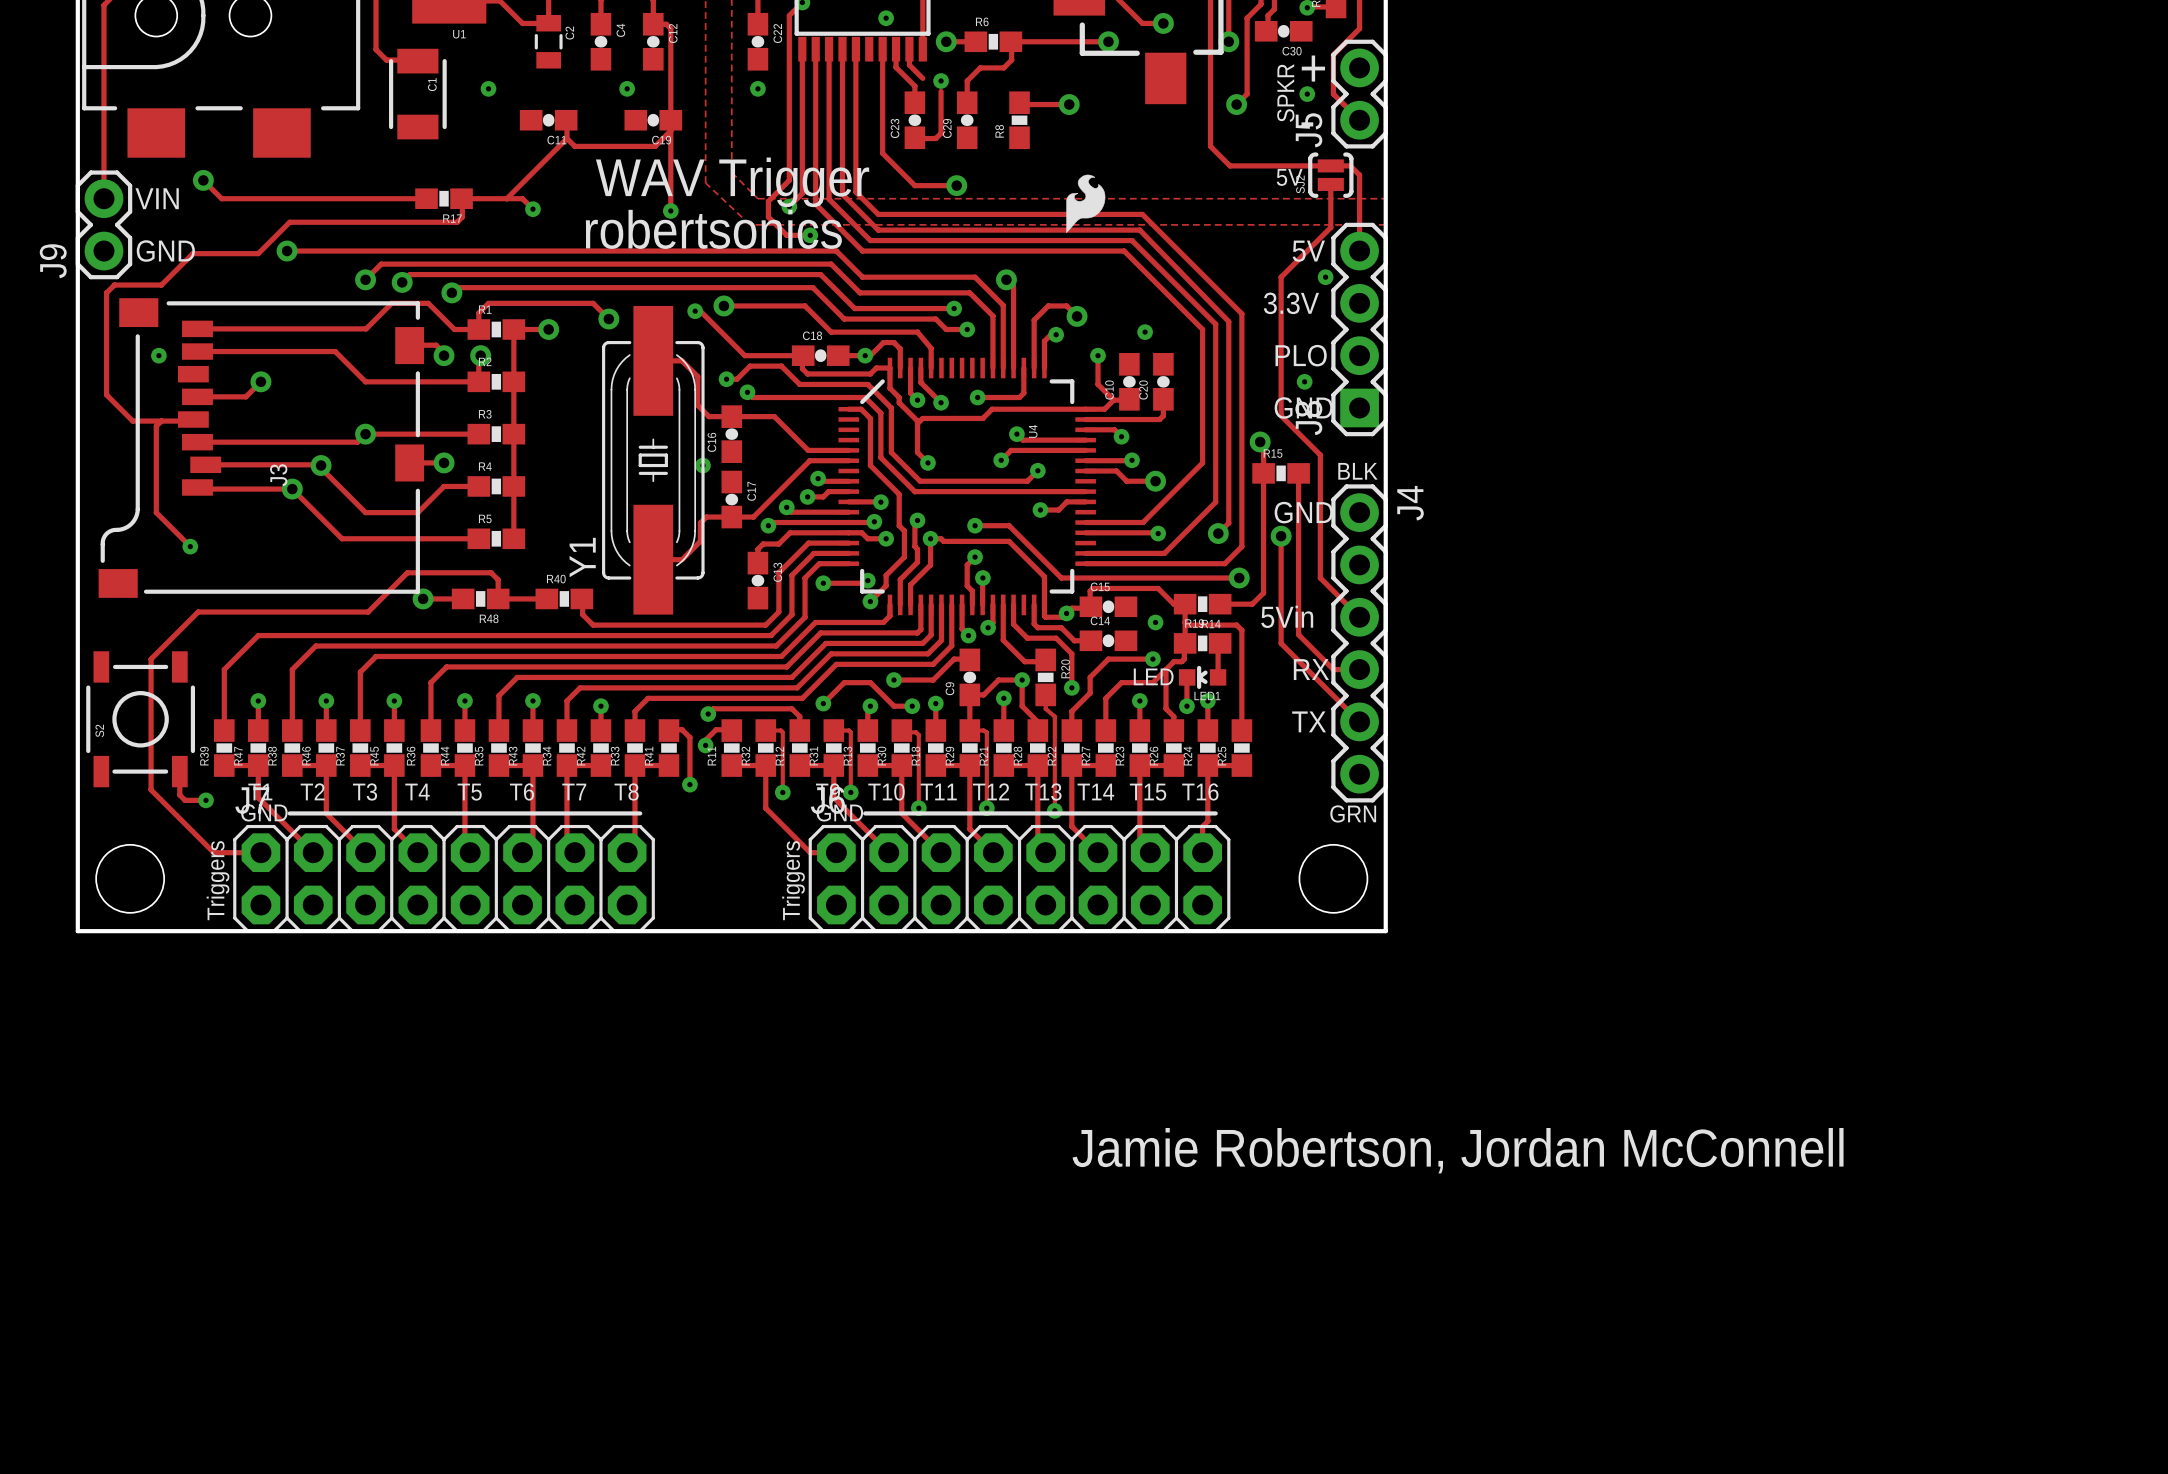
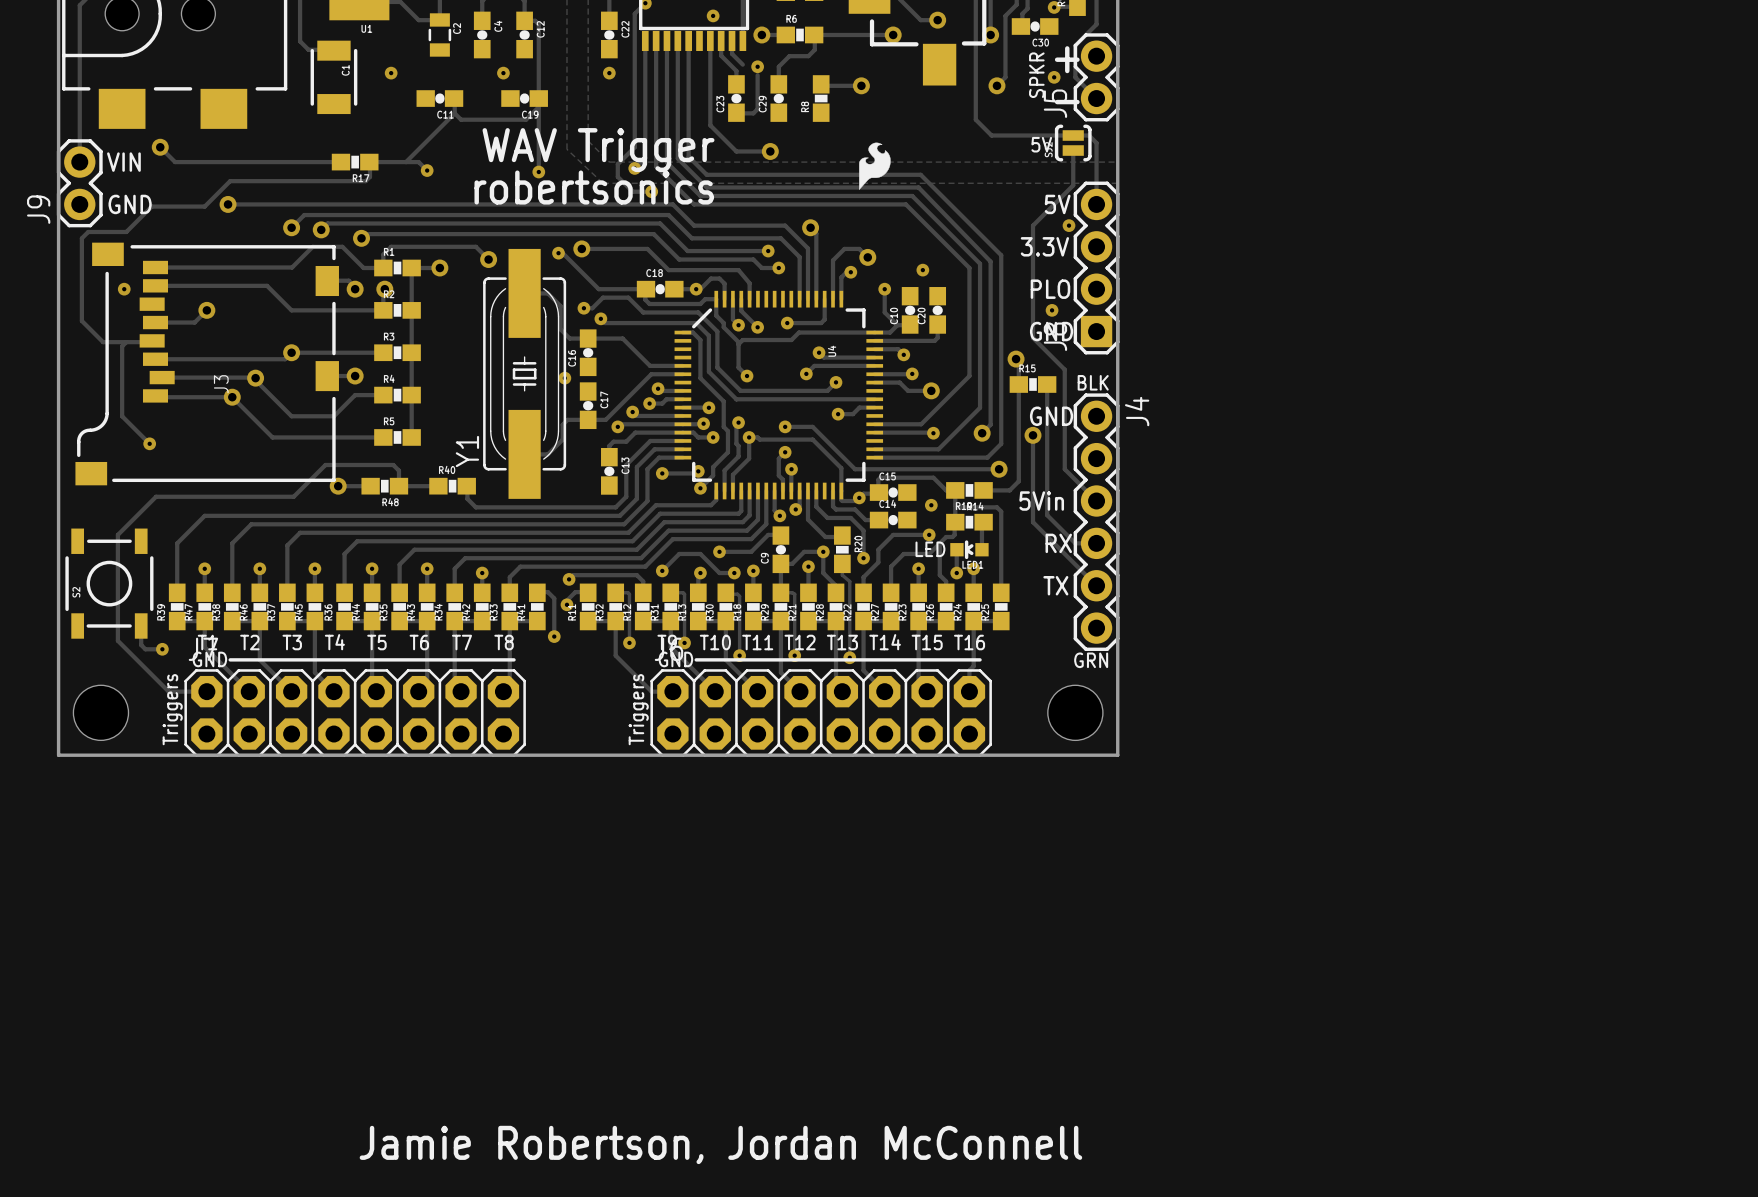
text: Jamie Robertson, Jordan McConnell (1458, 1150) -> none
text: none -> Jamie Robertson, Jordan McConnell (720, 1144)

